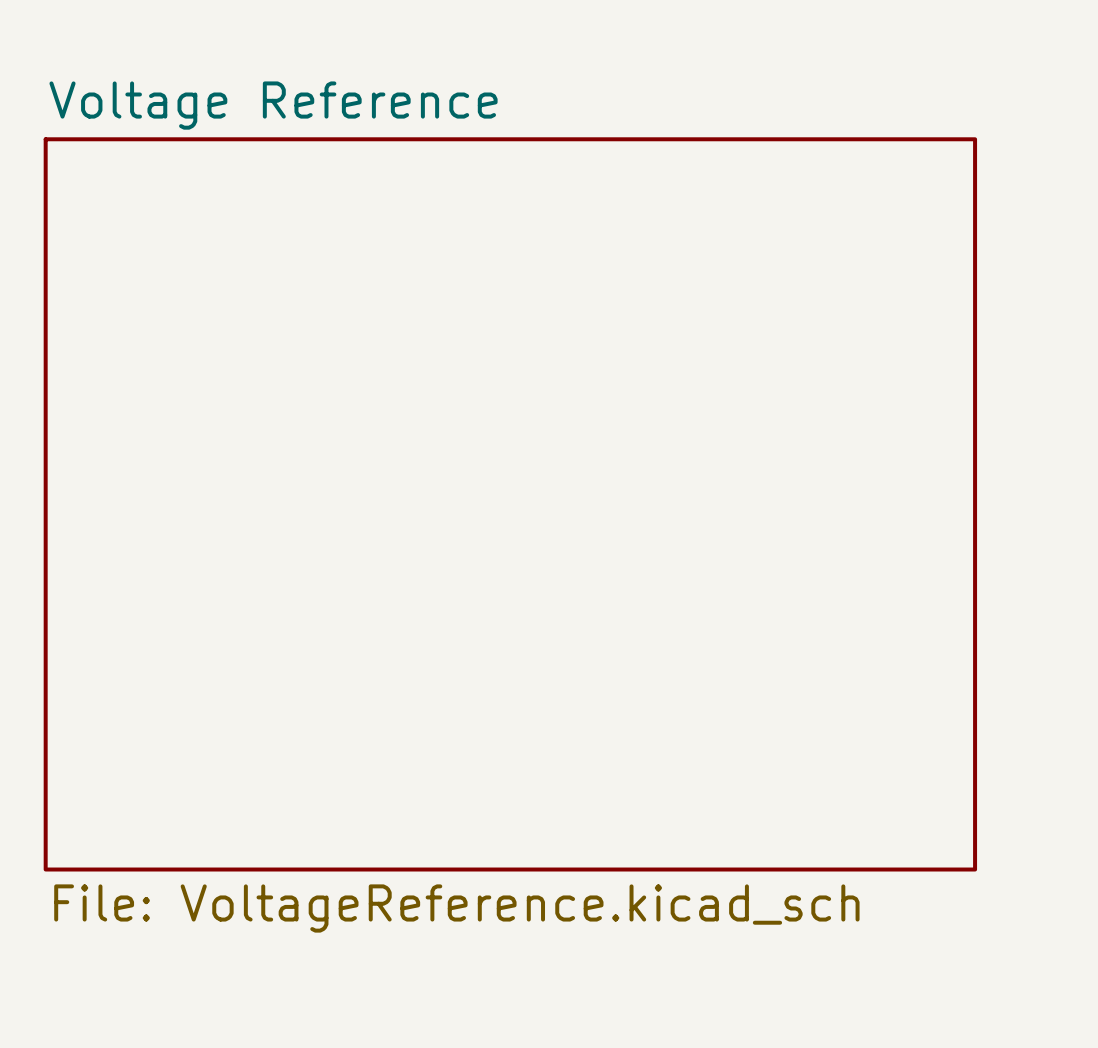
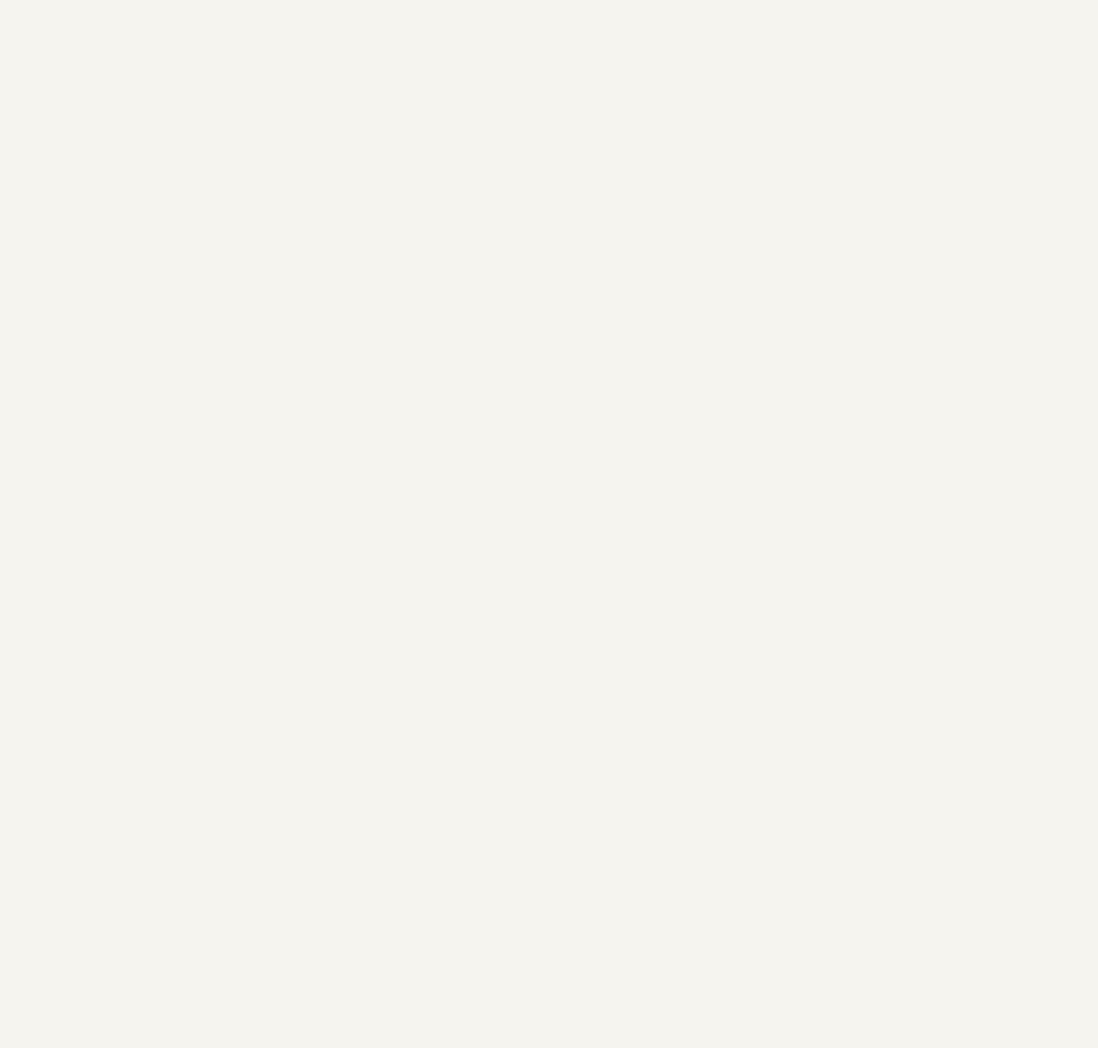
sheet Voltage Reference: File: VoltageReference.kicad_sch (510, 504) -> none

